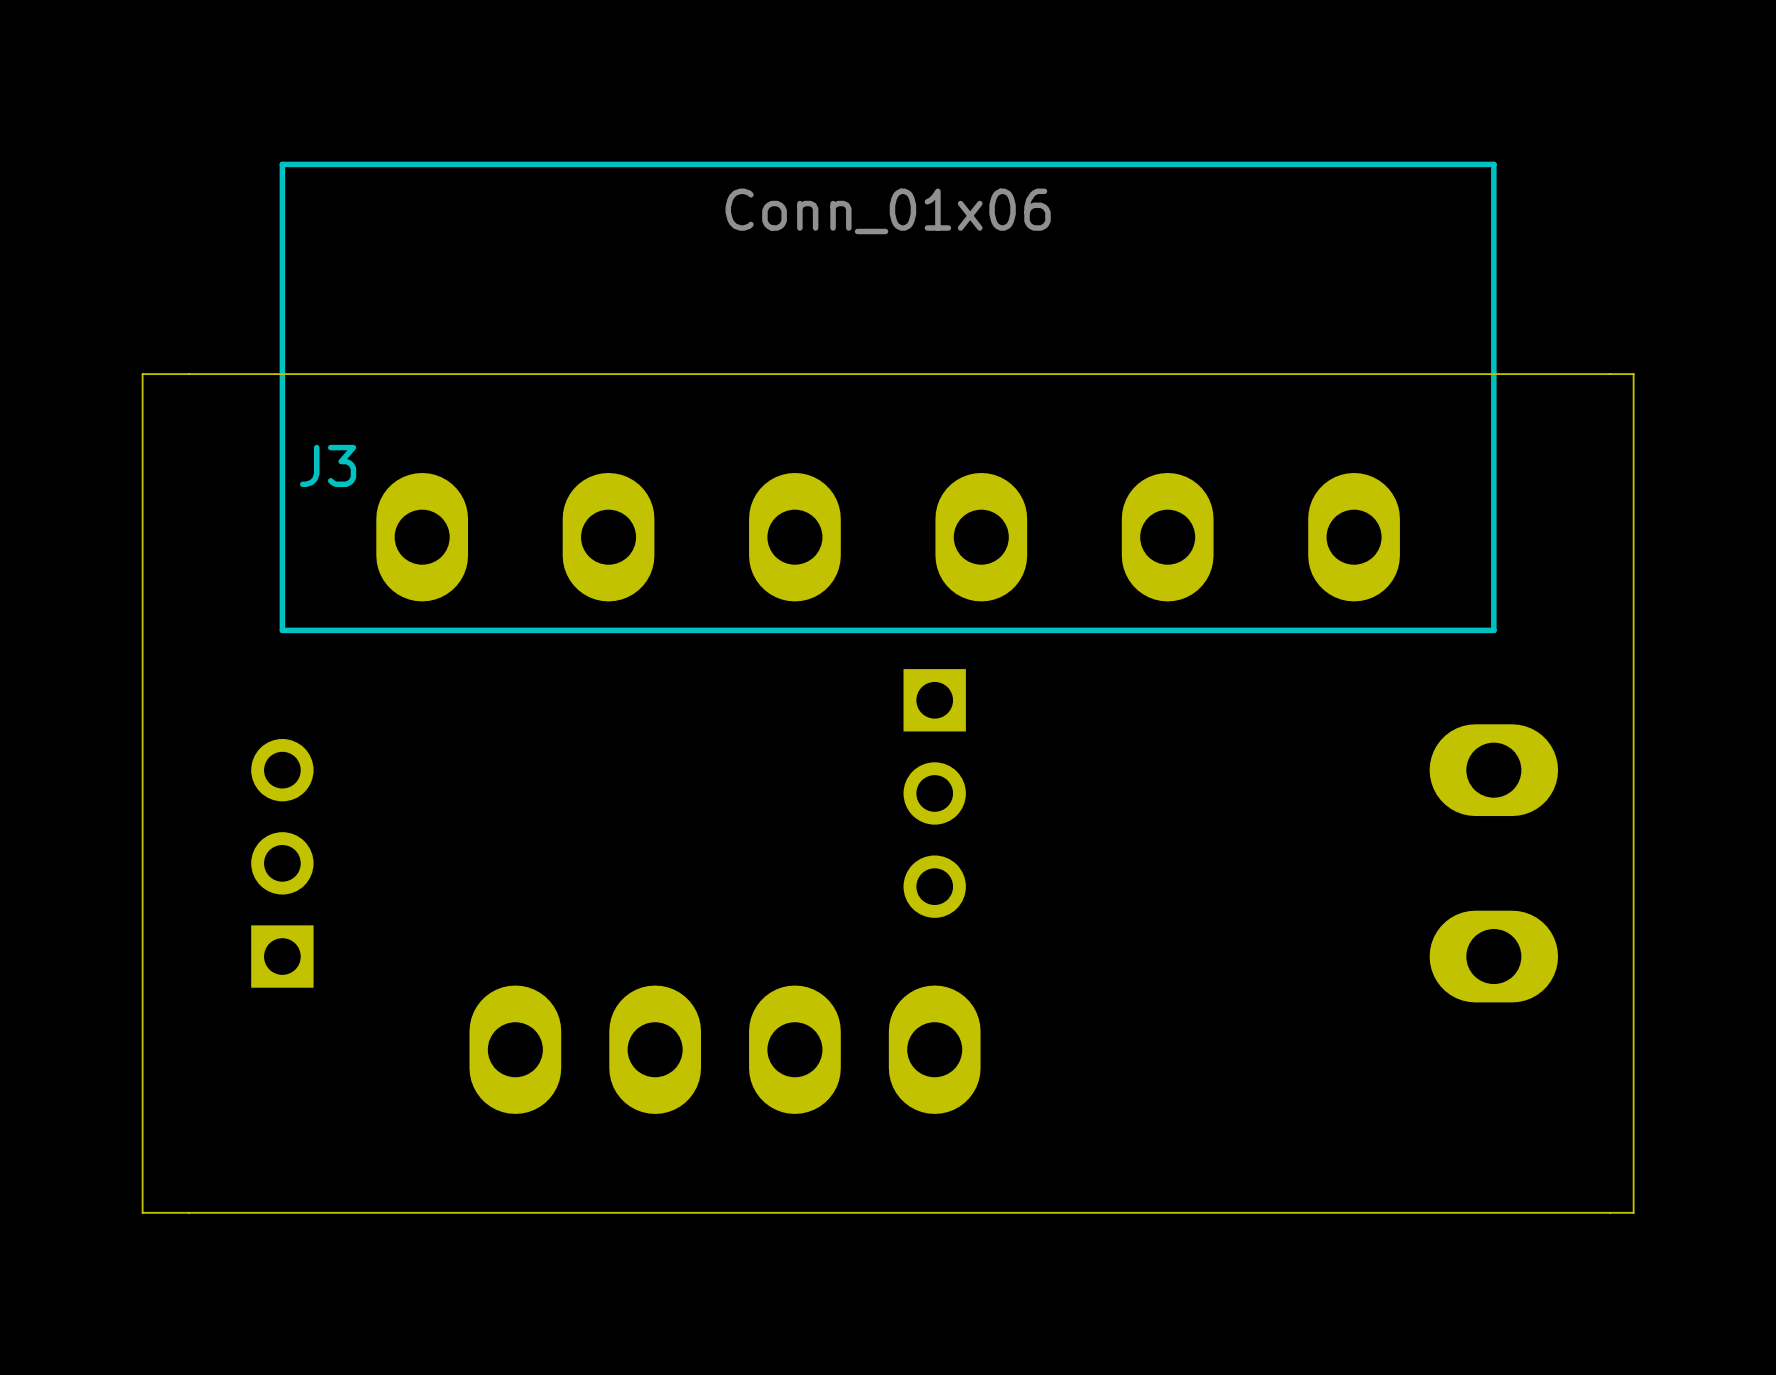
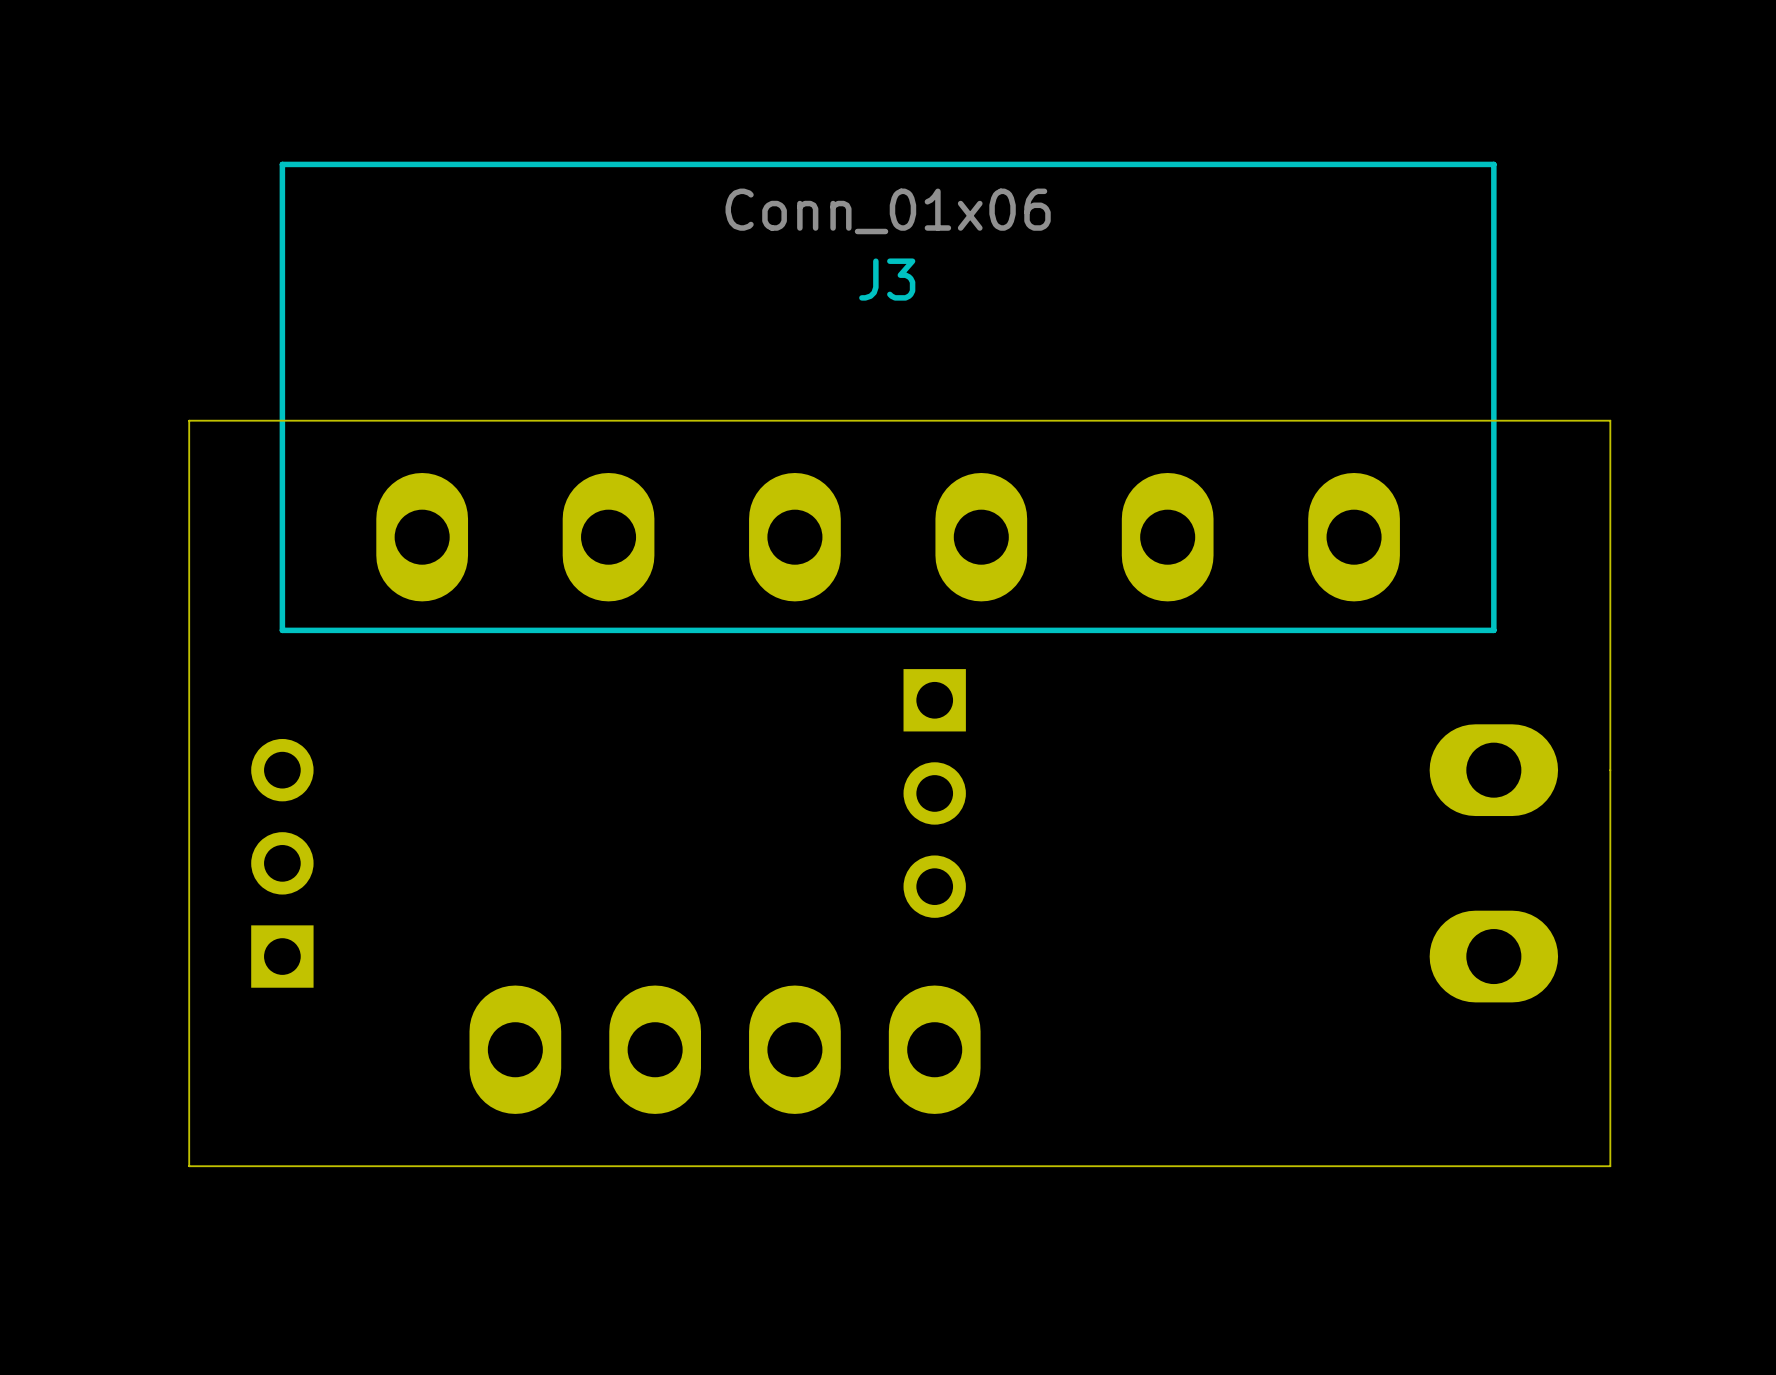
board edge: (1633, 374) (1633, 1212) (142, 1212) (142, 374) (1633, 374) -> (1610, 420) (1610, 1166) (189, 1166) (189, 420) (1610, 420)
J3 name position: J3 (328, 465) -> J3 (887, 279)

